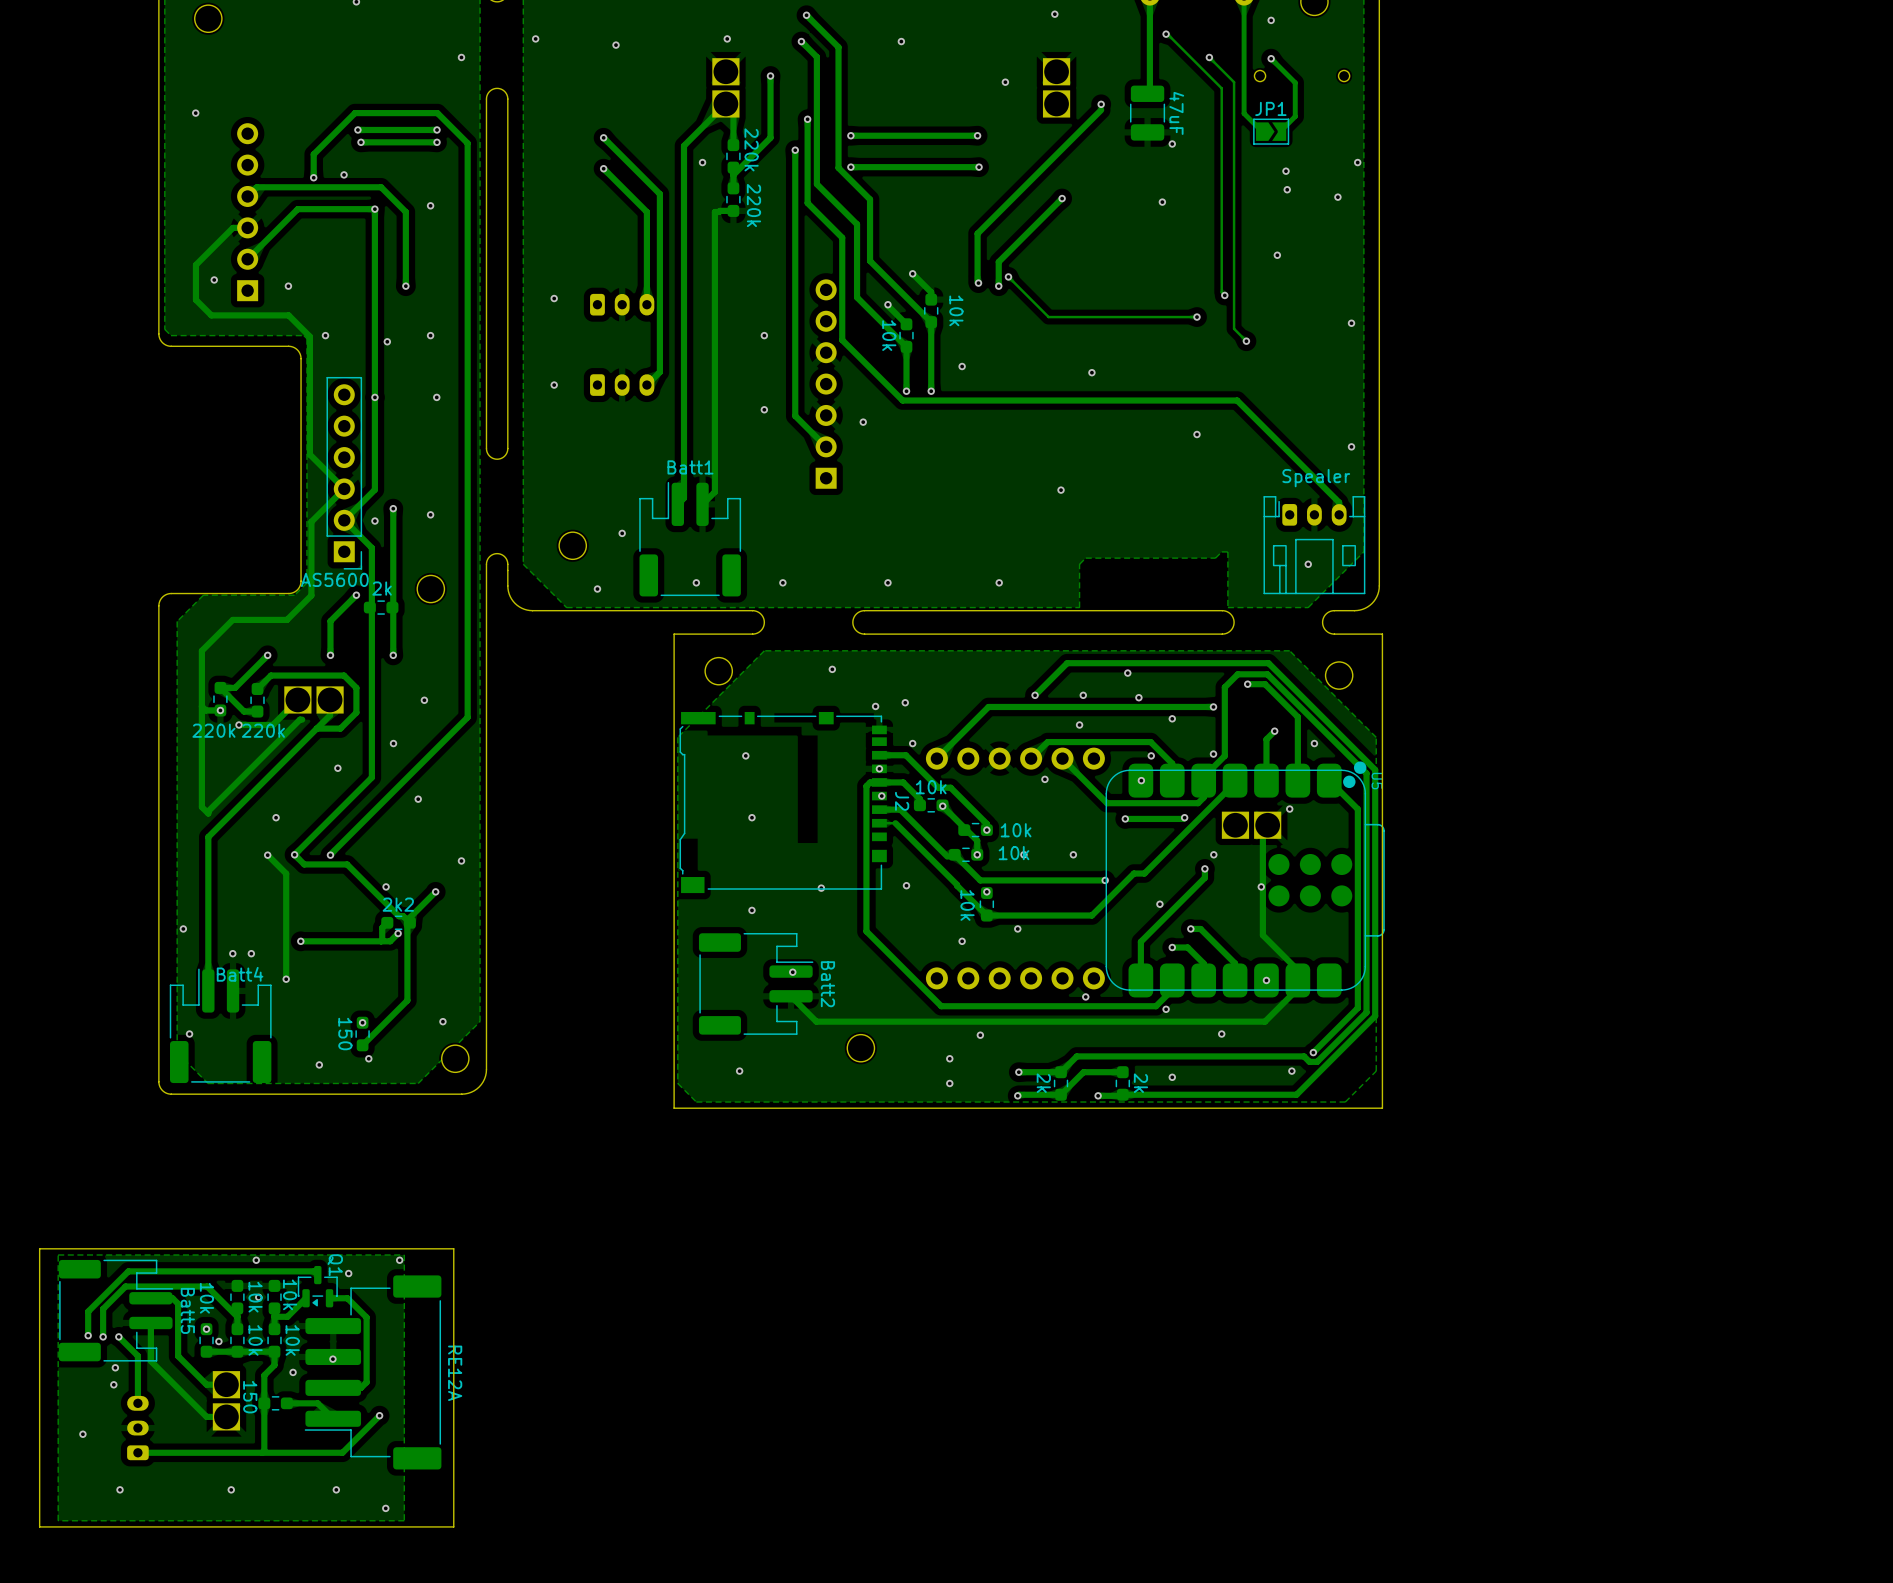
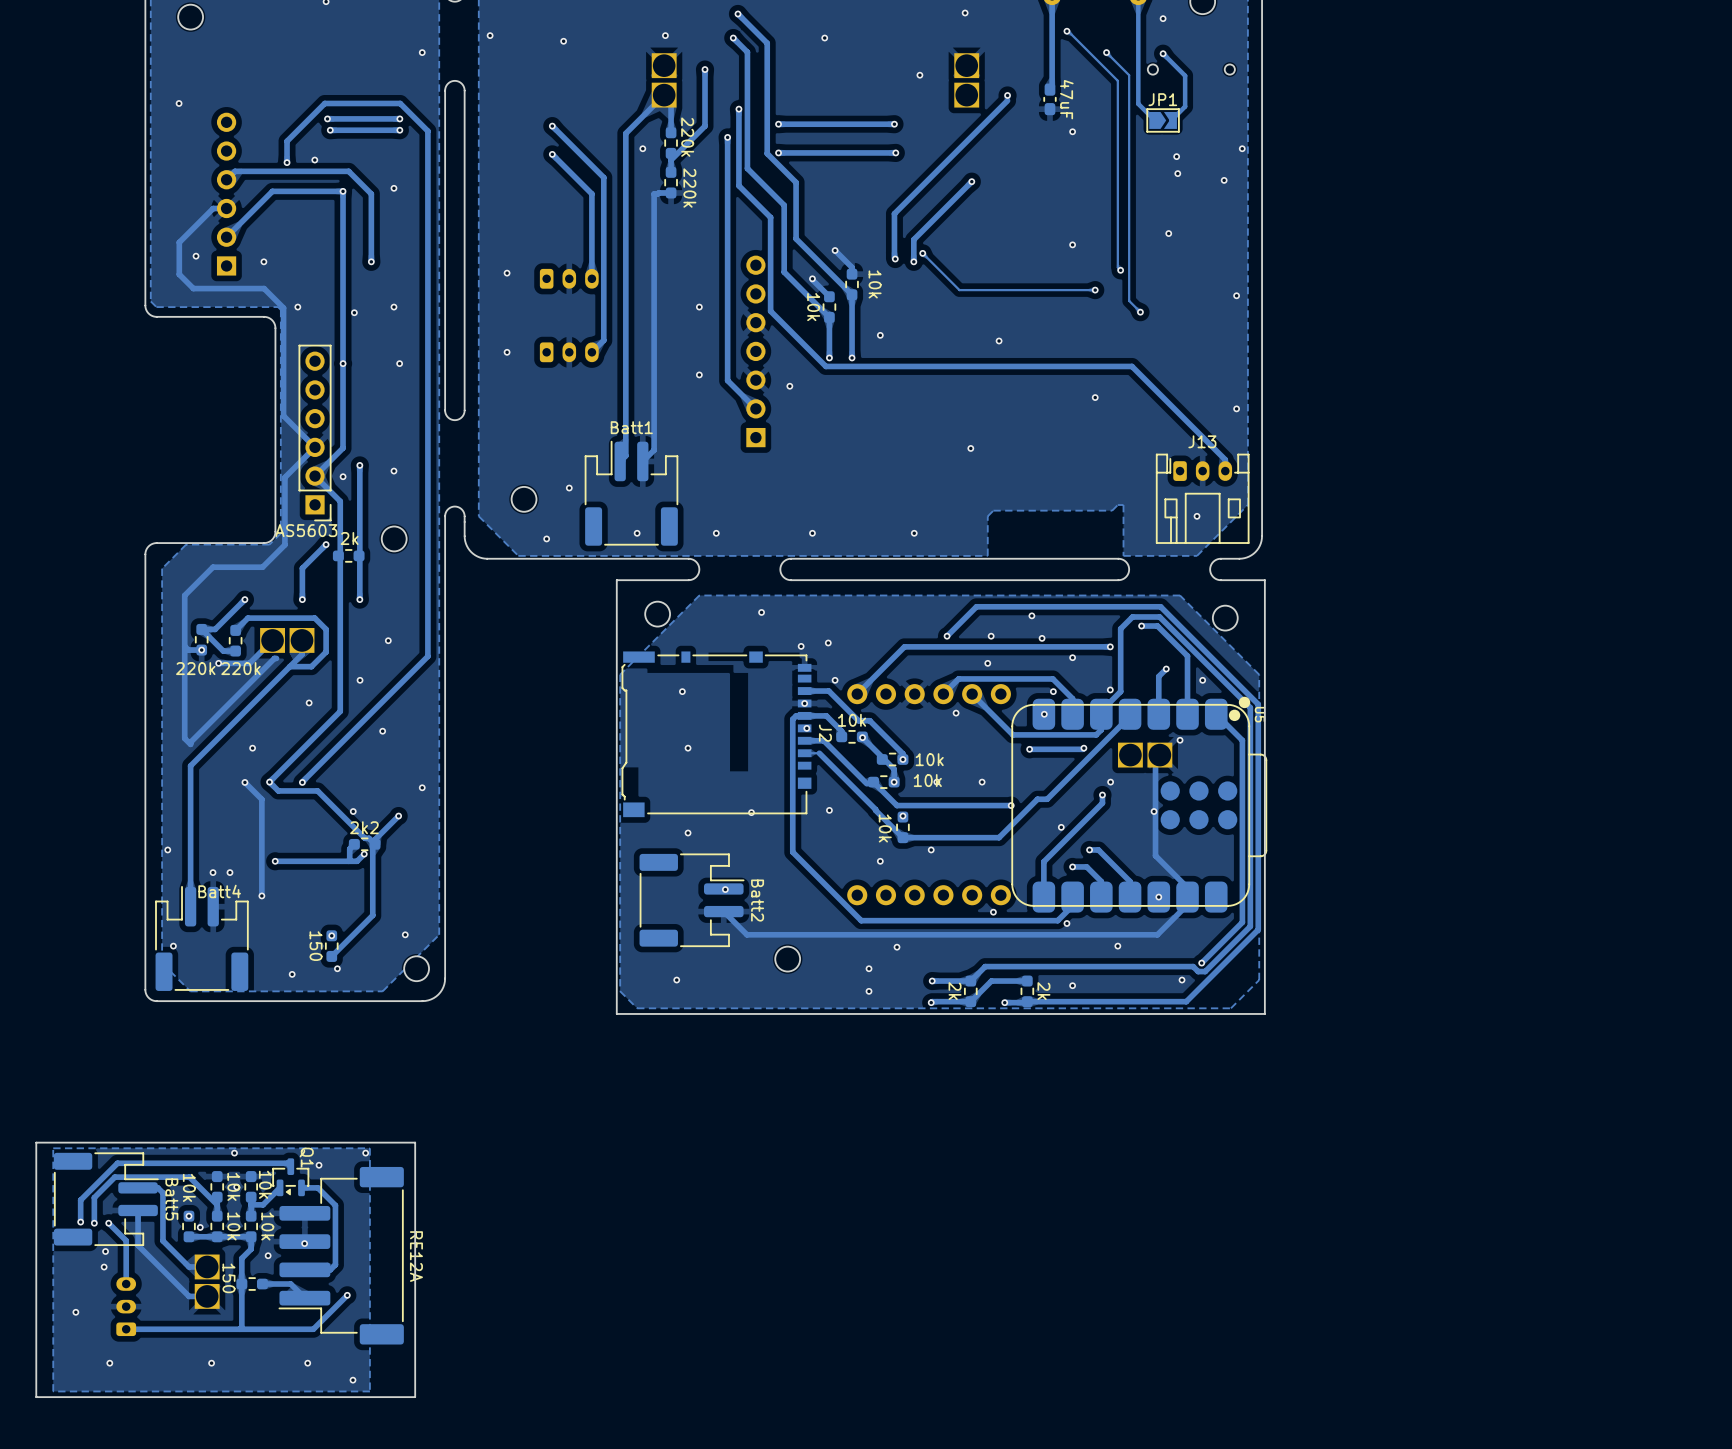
part footprint: [1130, 85, 1166, 141] -> [1043, 83, 1057, 116]
via position: (1162, 202) -> (1072, 244)
J13 text: Spealer (1316, 478) -> none
J13 name: none -> J13 (1202, 441)
AS5600 name: AS5600 (334, 579) -> AS5603 (306, 530)

